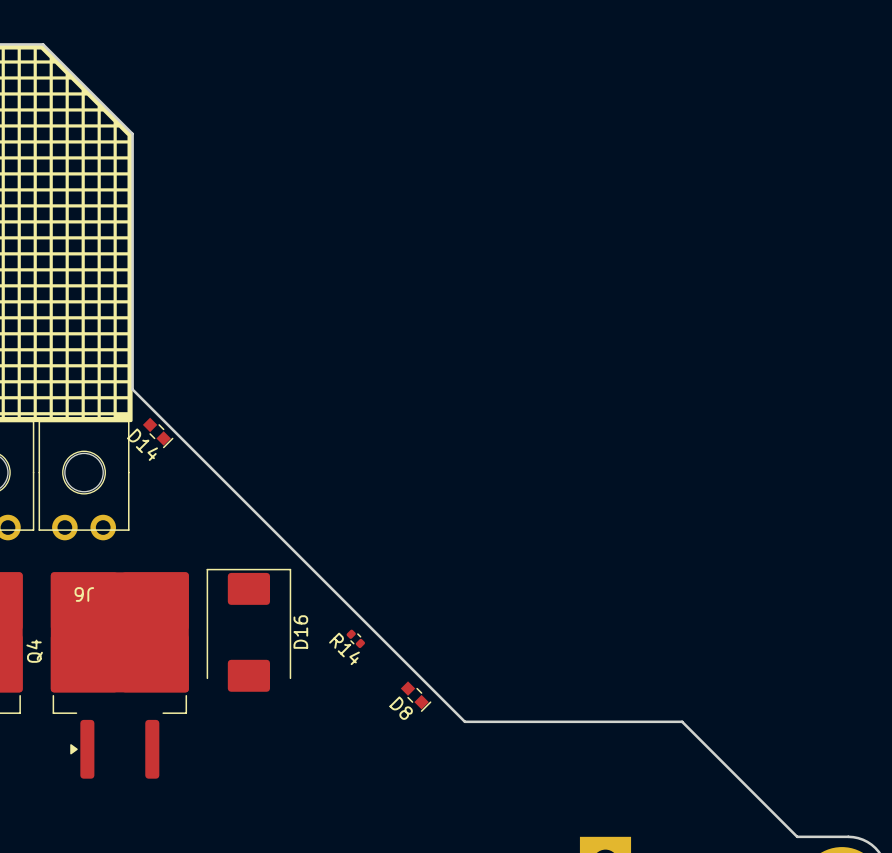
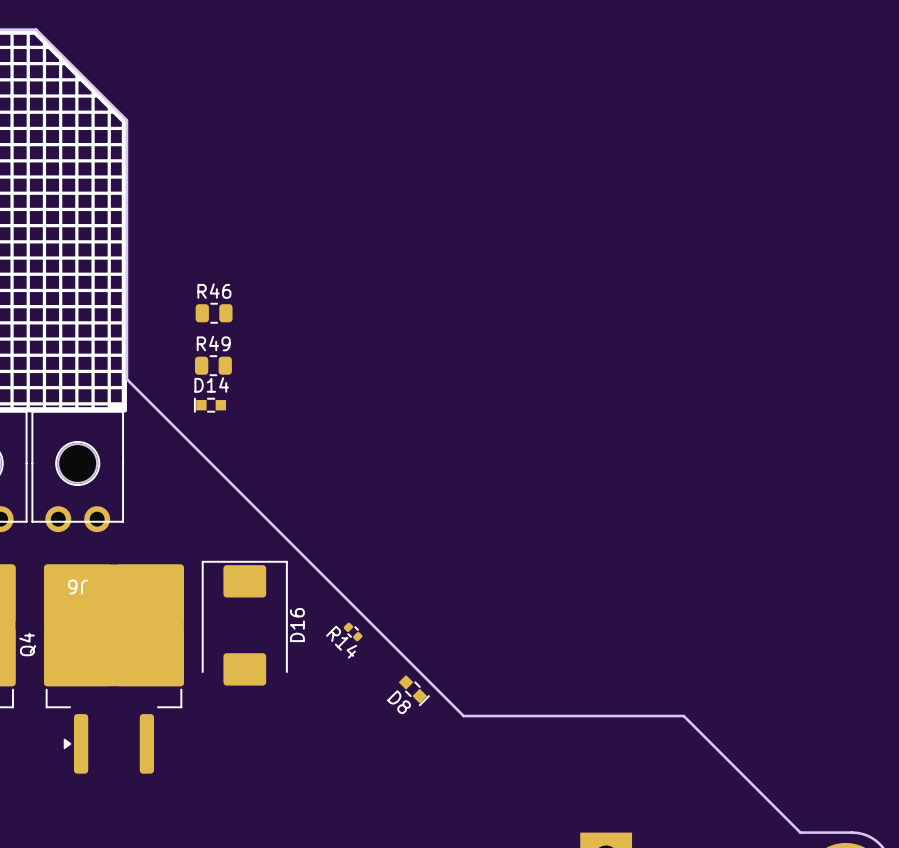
R46: none -> (214, 313)
R49: none -> (213, 365)
D14 rotation: 0° (158, 432) -> 135° clockwise (210, 405)
D14 position: (158, 432) -> (210, 405)

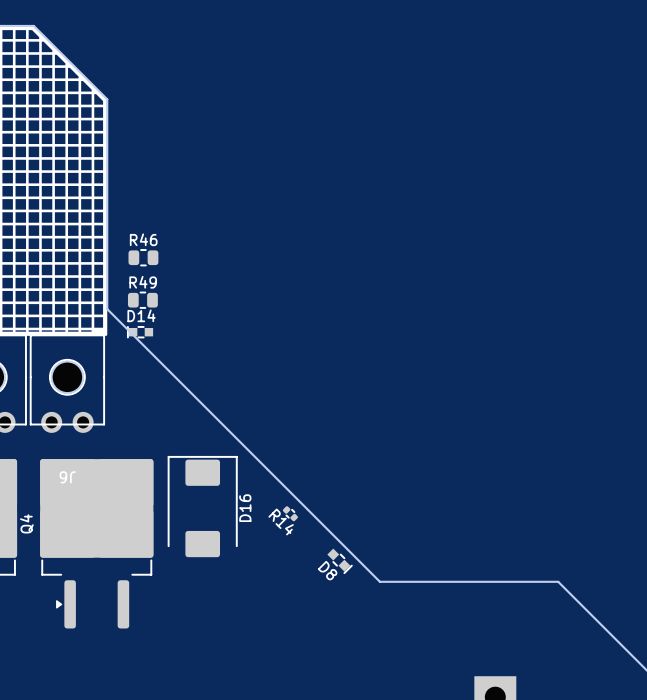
R46 position: (214, 313) -> (143, 257)
R49 position: (213, 365) -> (142, 300)
D14 position: (210, 405) -> (140, 332)

